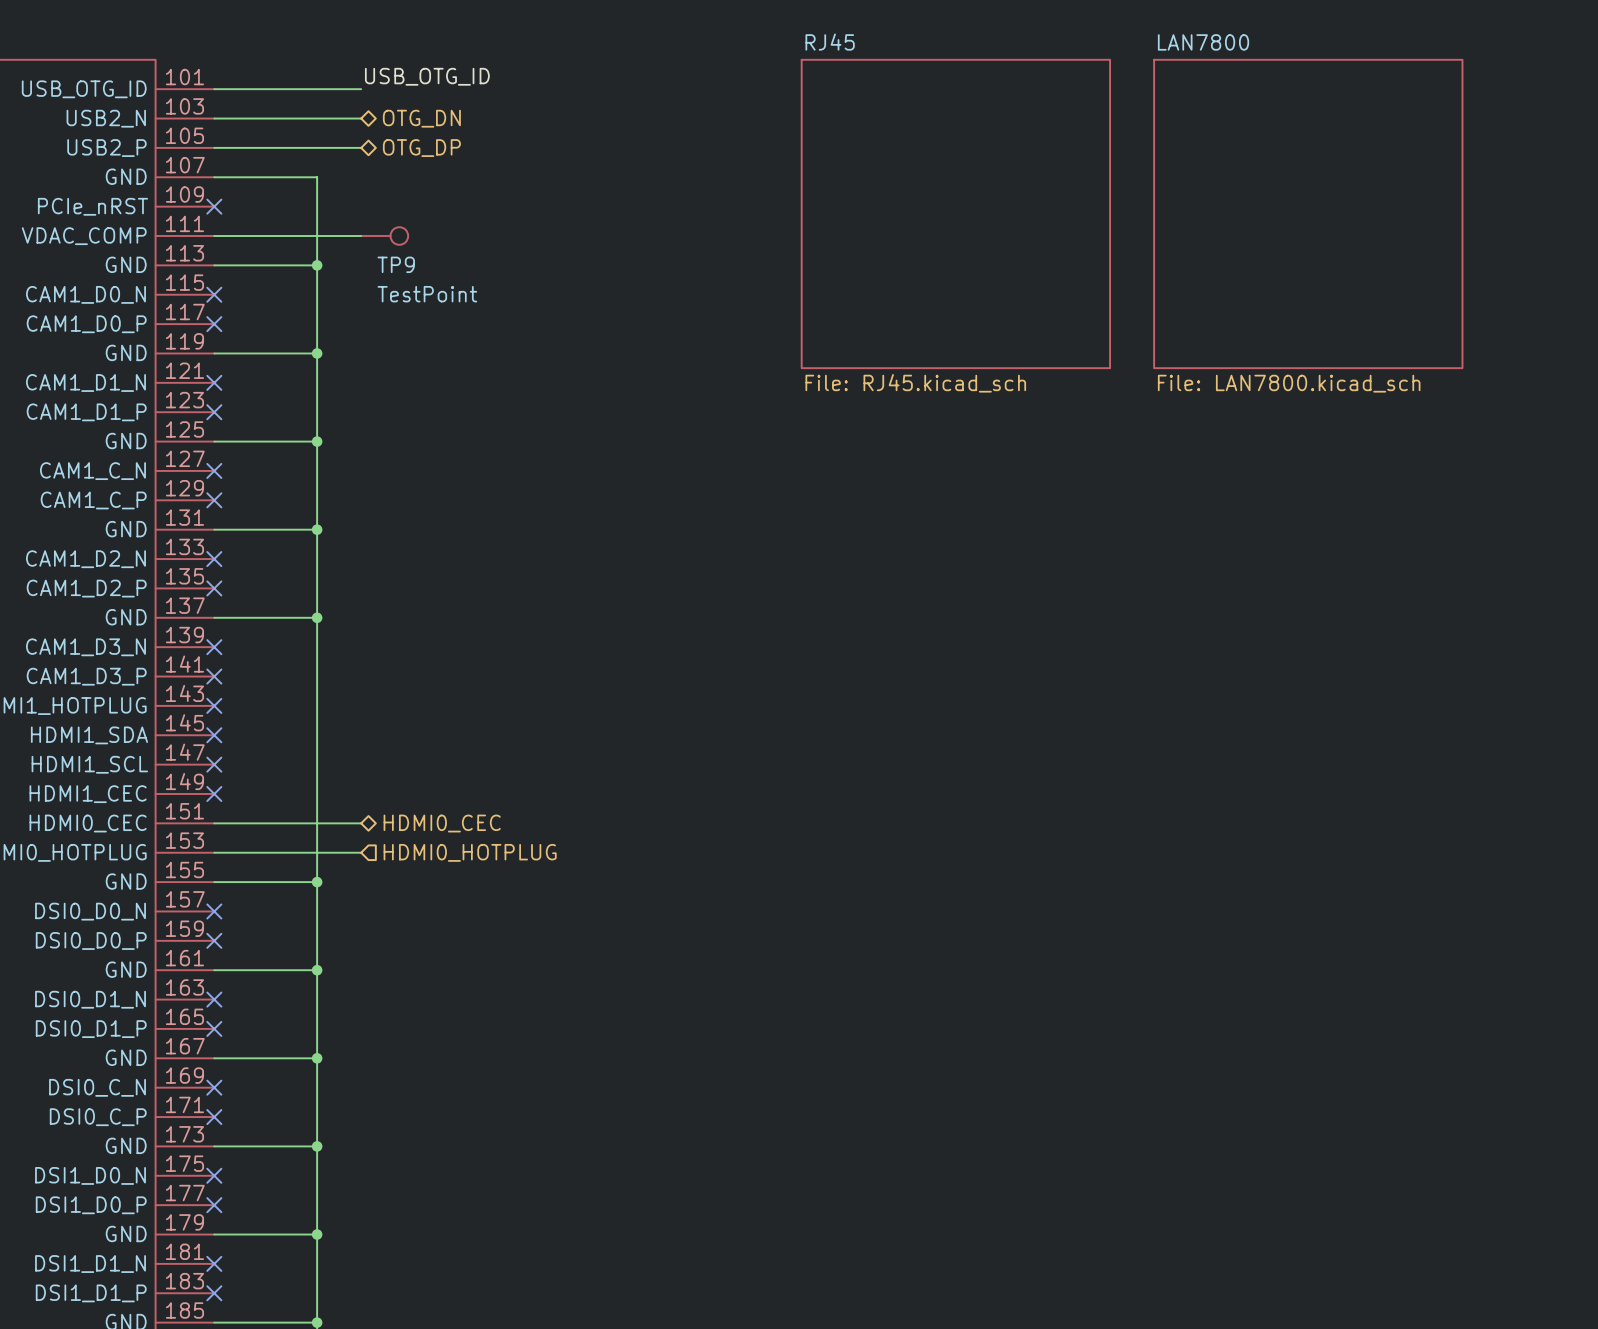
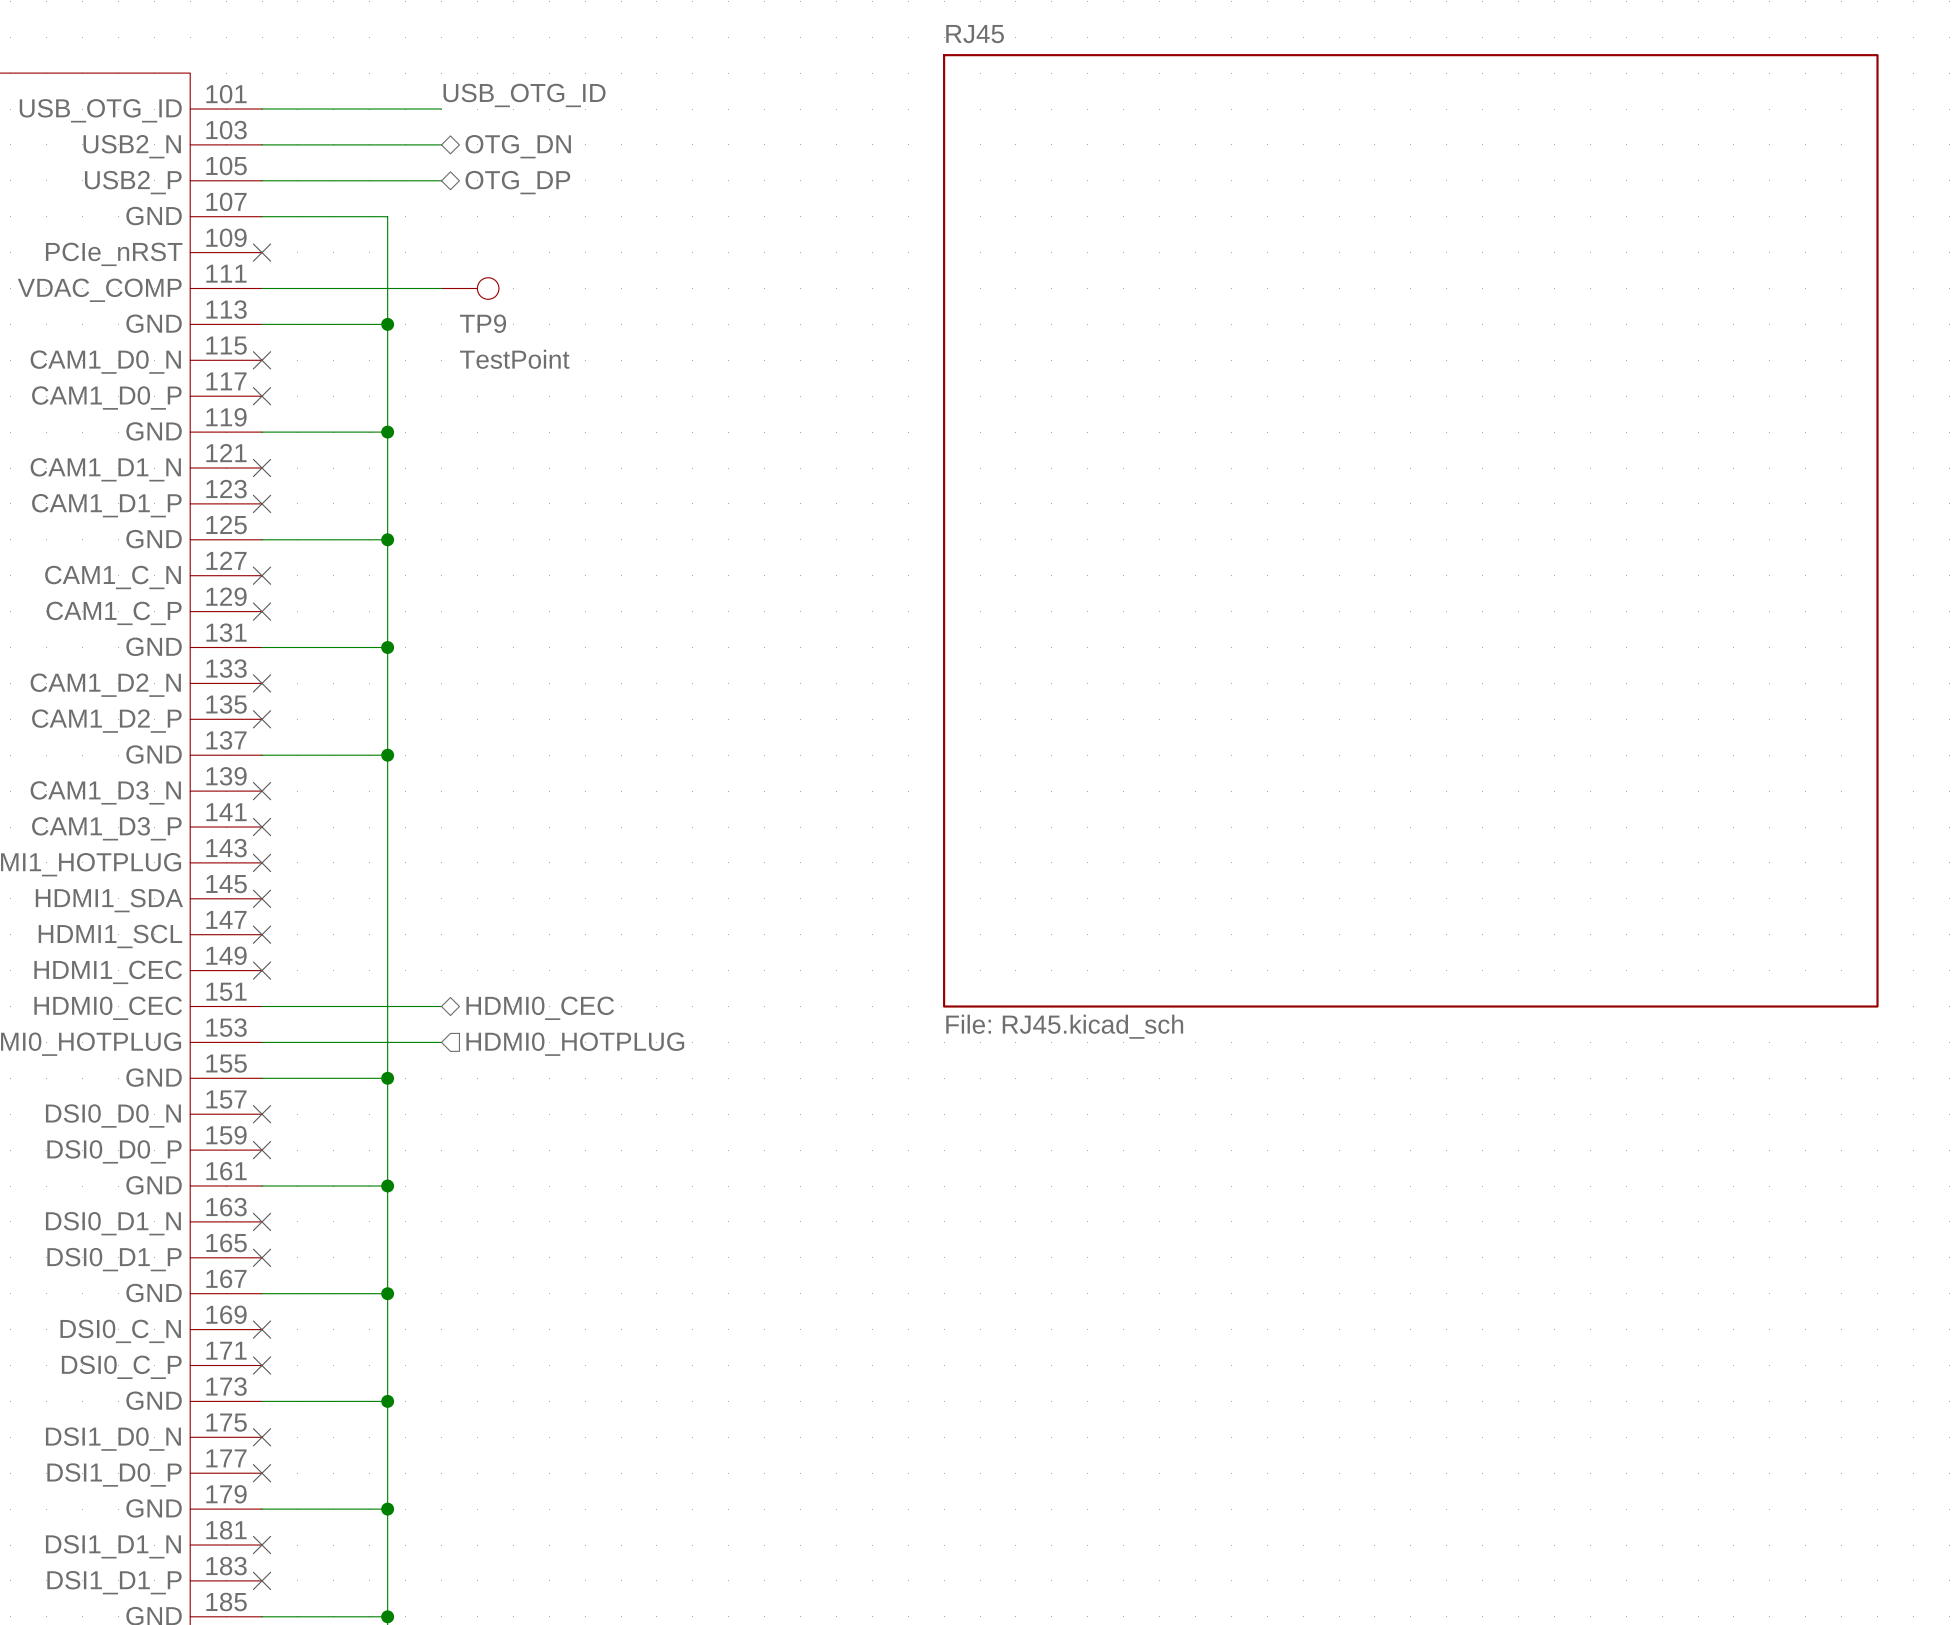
sheet RJ45 name position: RJ45 (830, 42) -> RJ45 (975, 34)
sheet RJ45 shape: [800, 58, 1111, 370] -> [943, 54, 1879, 1008]
sheet LAN7800: File: LAN7800.kicad_sch (1308, 213) -> none
sheet RJ45 value position: File: RJ45.kicad_sch (915, 383) -> File: RJ45.kicad_sch (1064, 1026)

